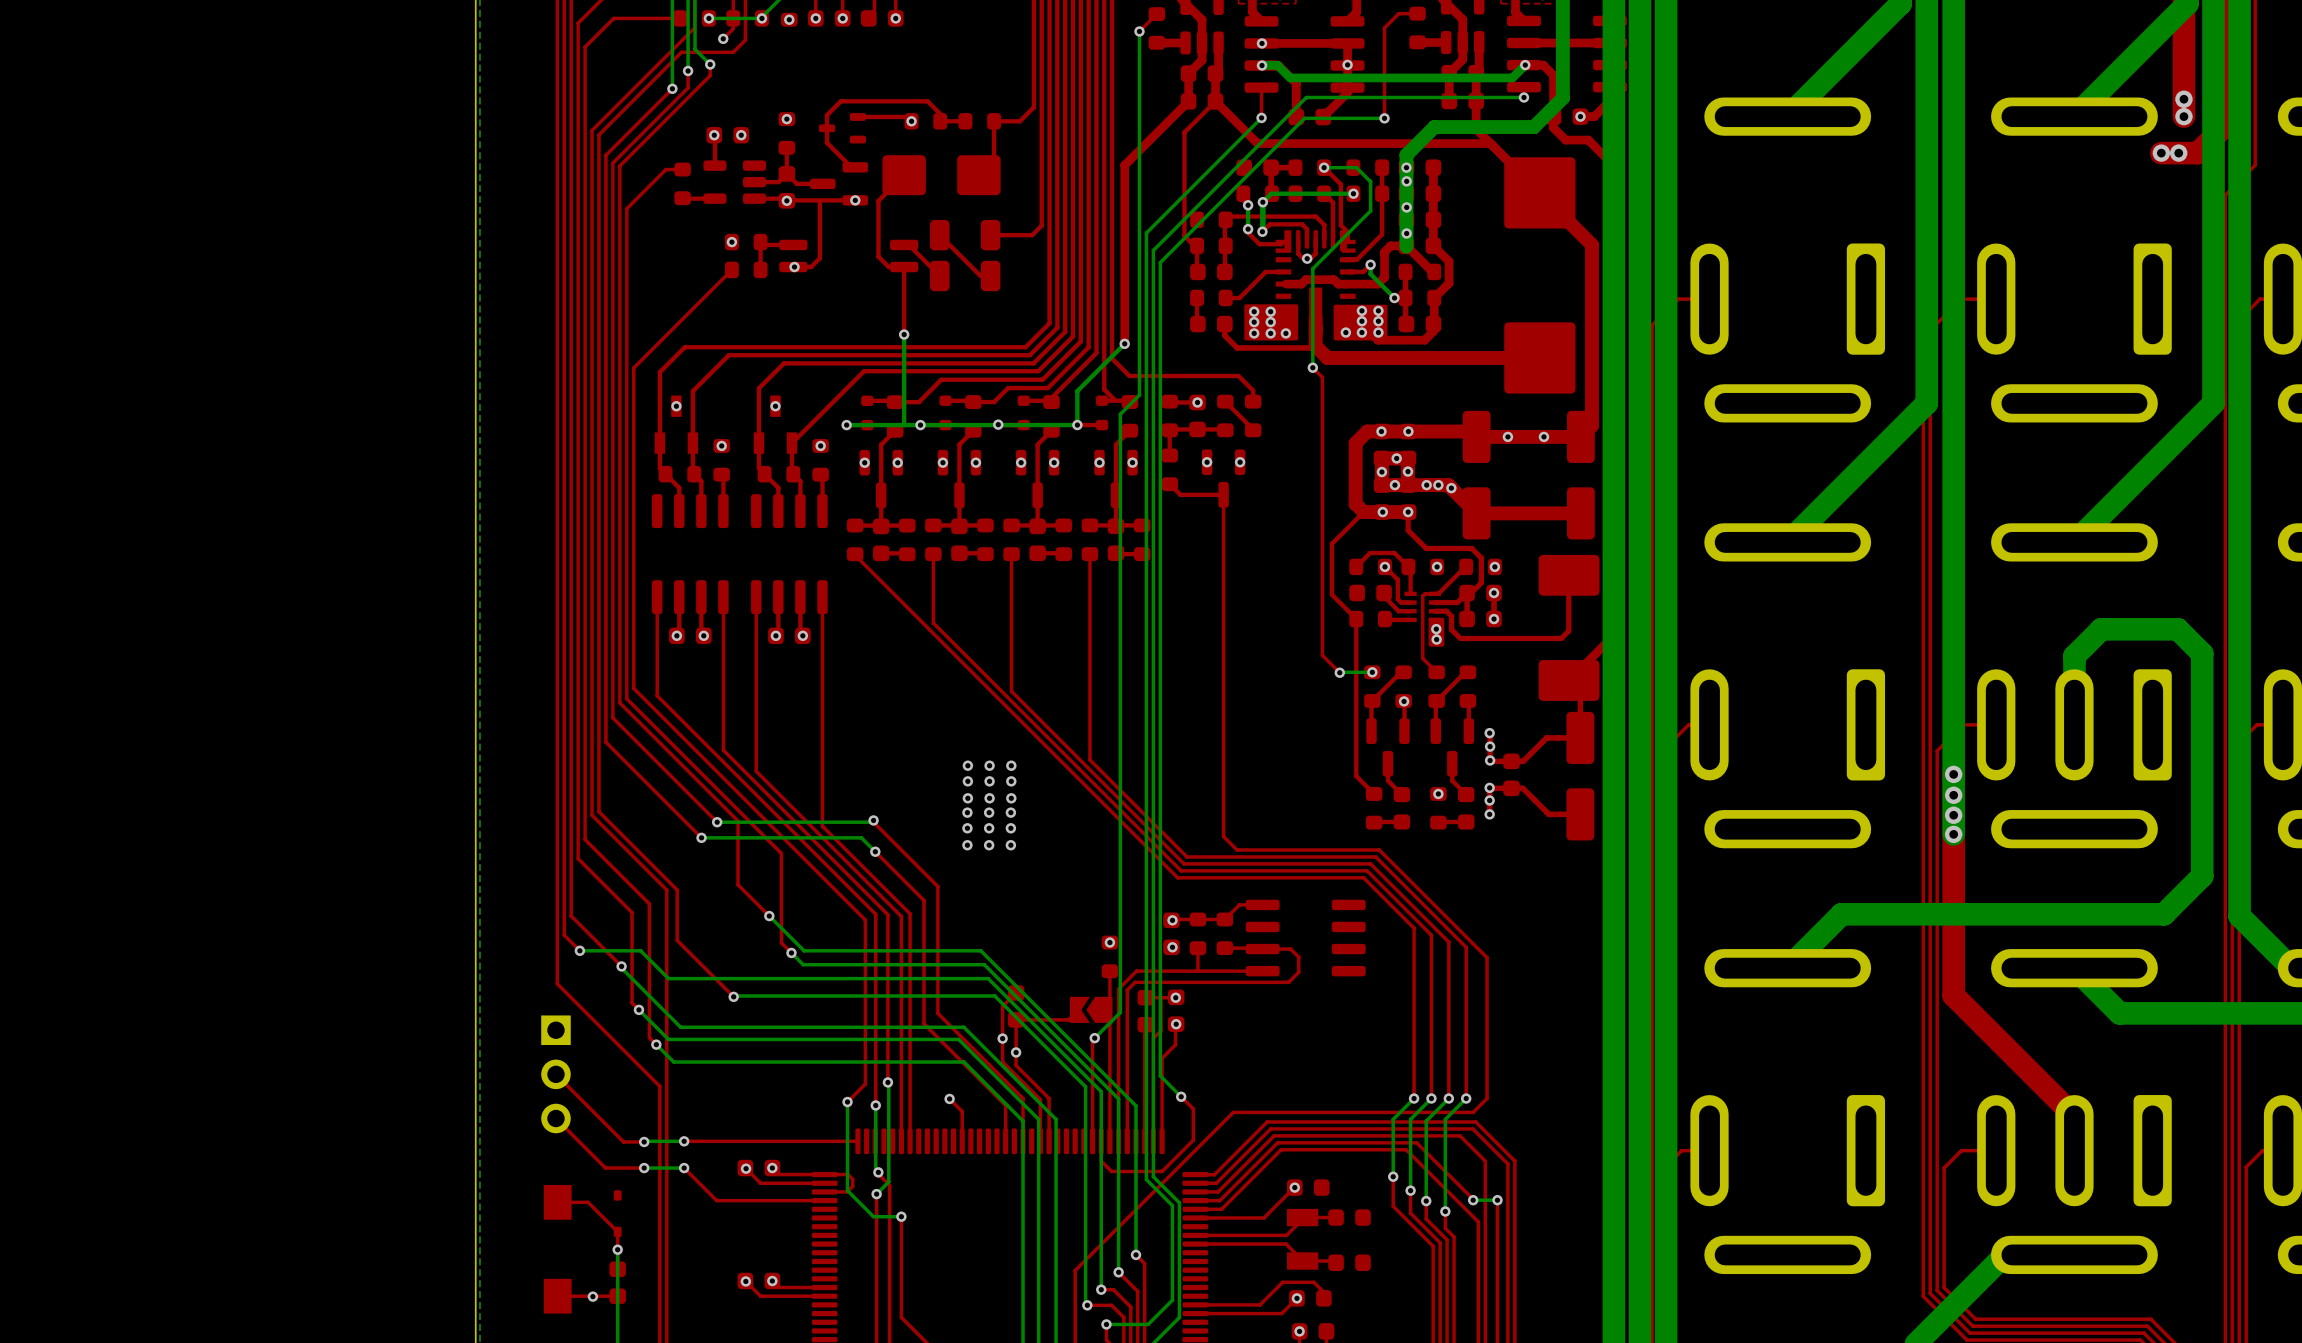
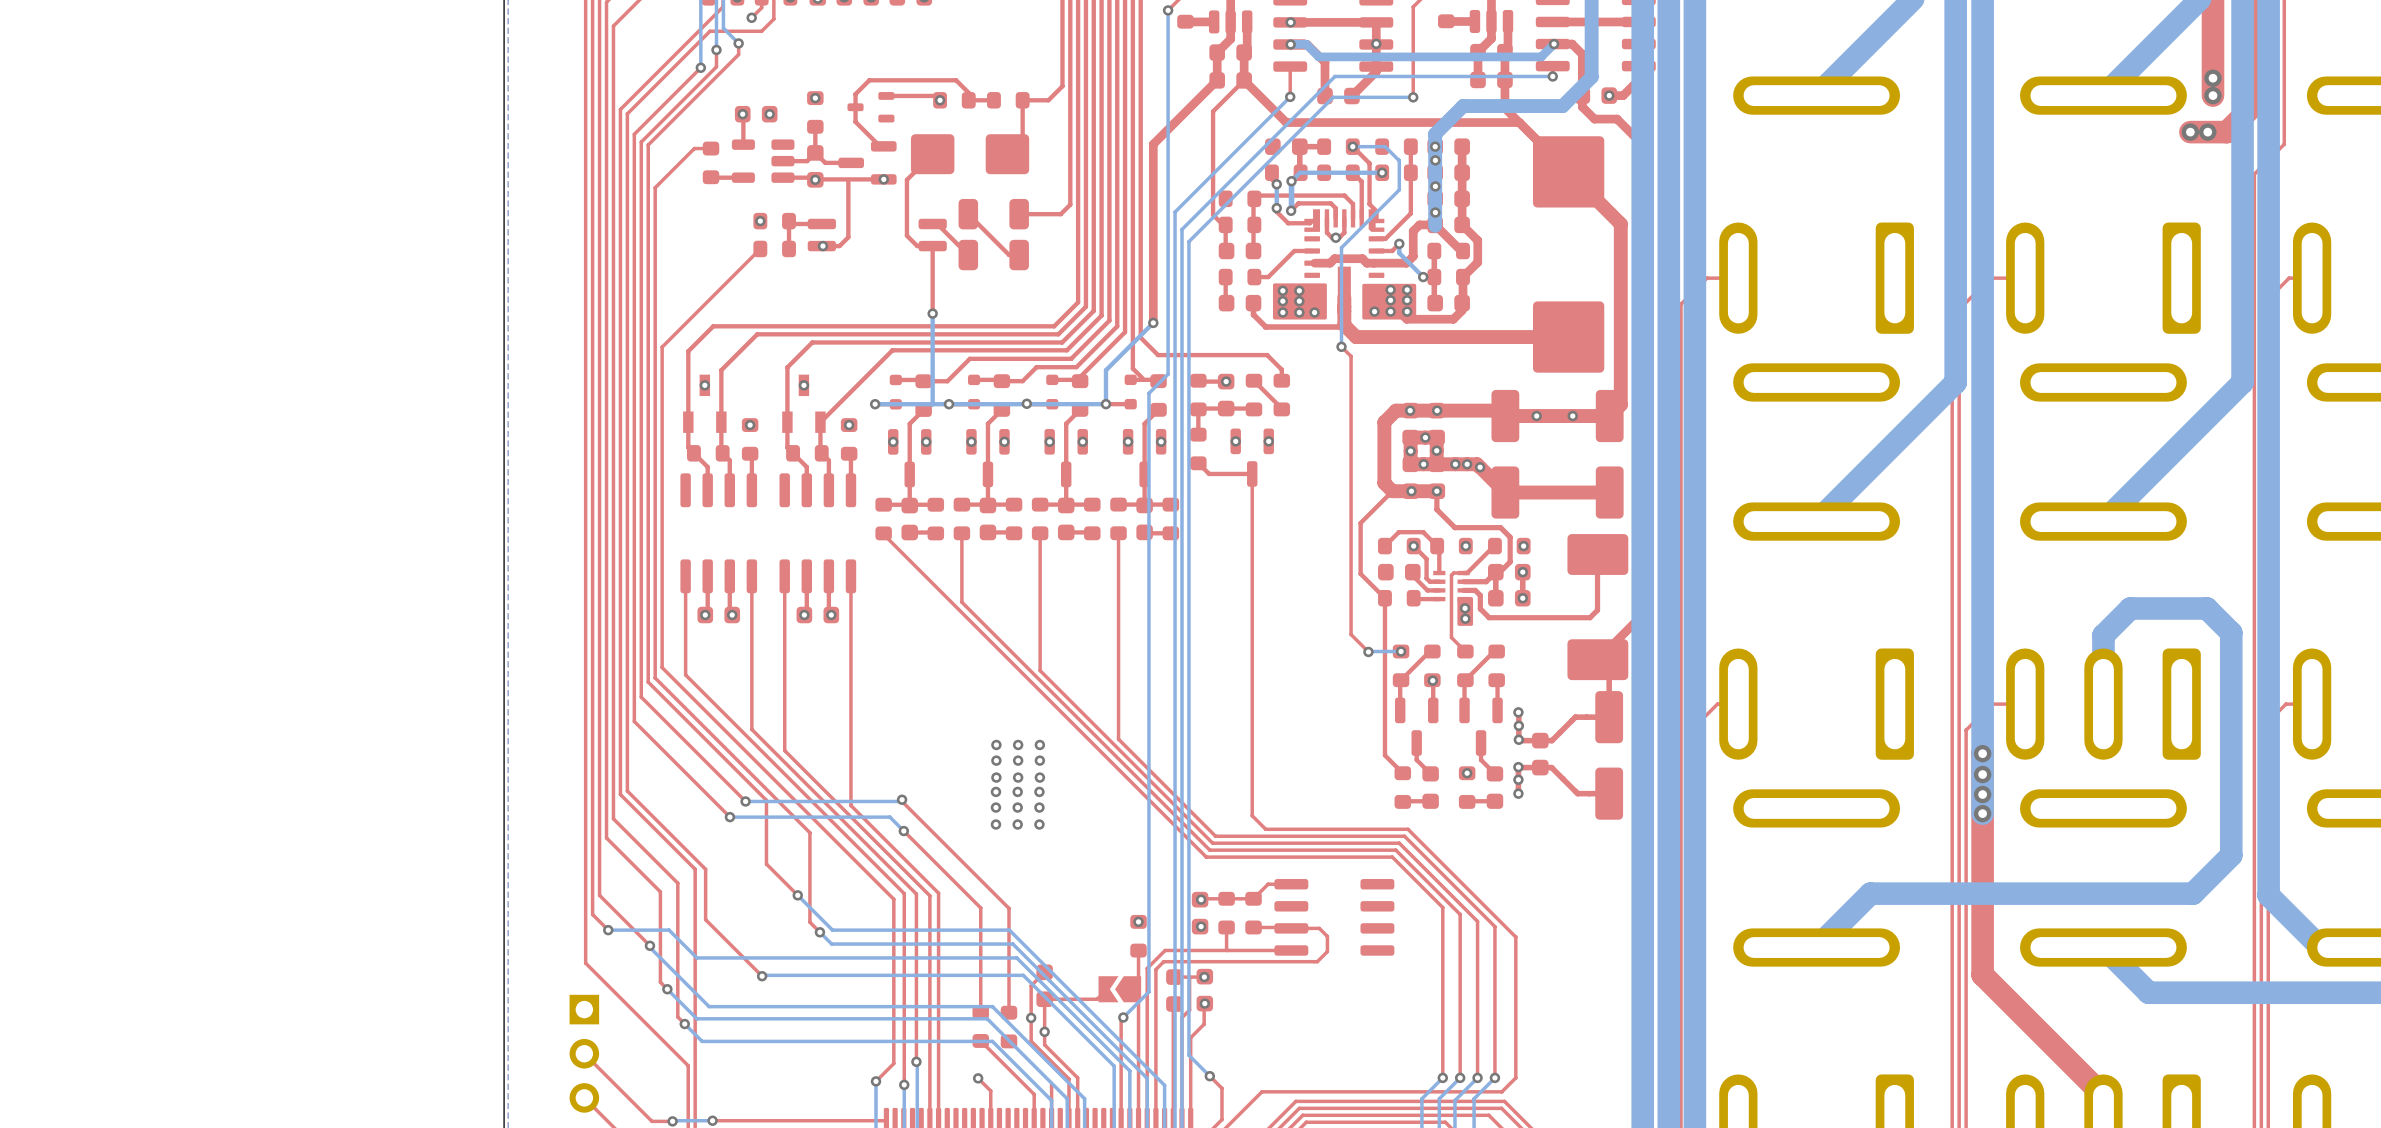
top track: (937, 886) (937, 1013) (1023, 1098) (1023, 1104) -> (966, 865) (1009, 908) (1009, 1012)
top track: (923, 900) (923, 1023) (1005, 1105) (1005, 1115) -> (952, 879) (980, 907) (980, 1012)
part: none -> (980, 1026)
part: none -> (1009, 1027)
top track: none -> (980, 1040) (1034, 1094)

